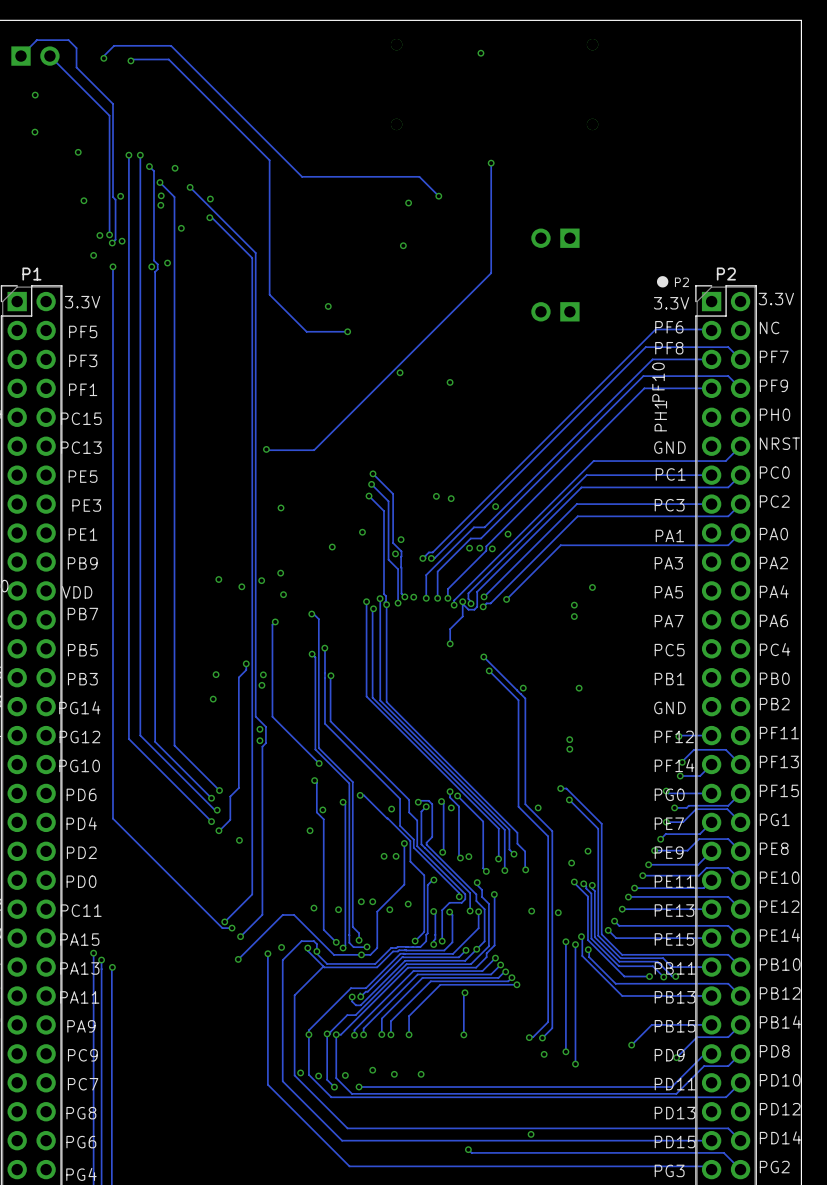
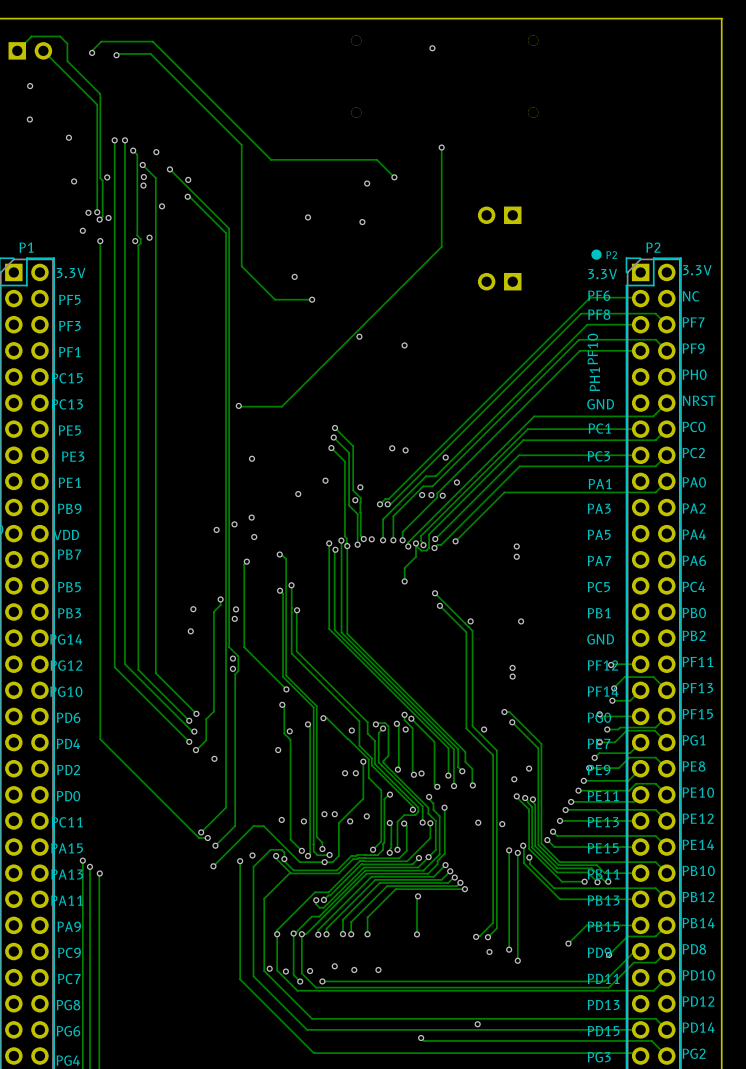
via: none -> (308, 217)
via: (218, 579) -> none
via: (592, 587) -> none

